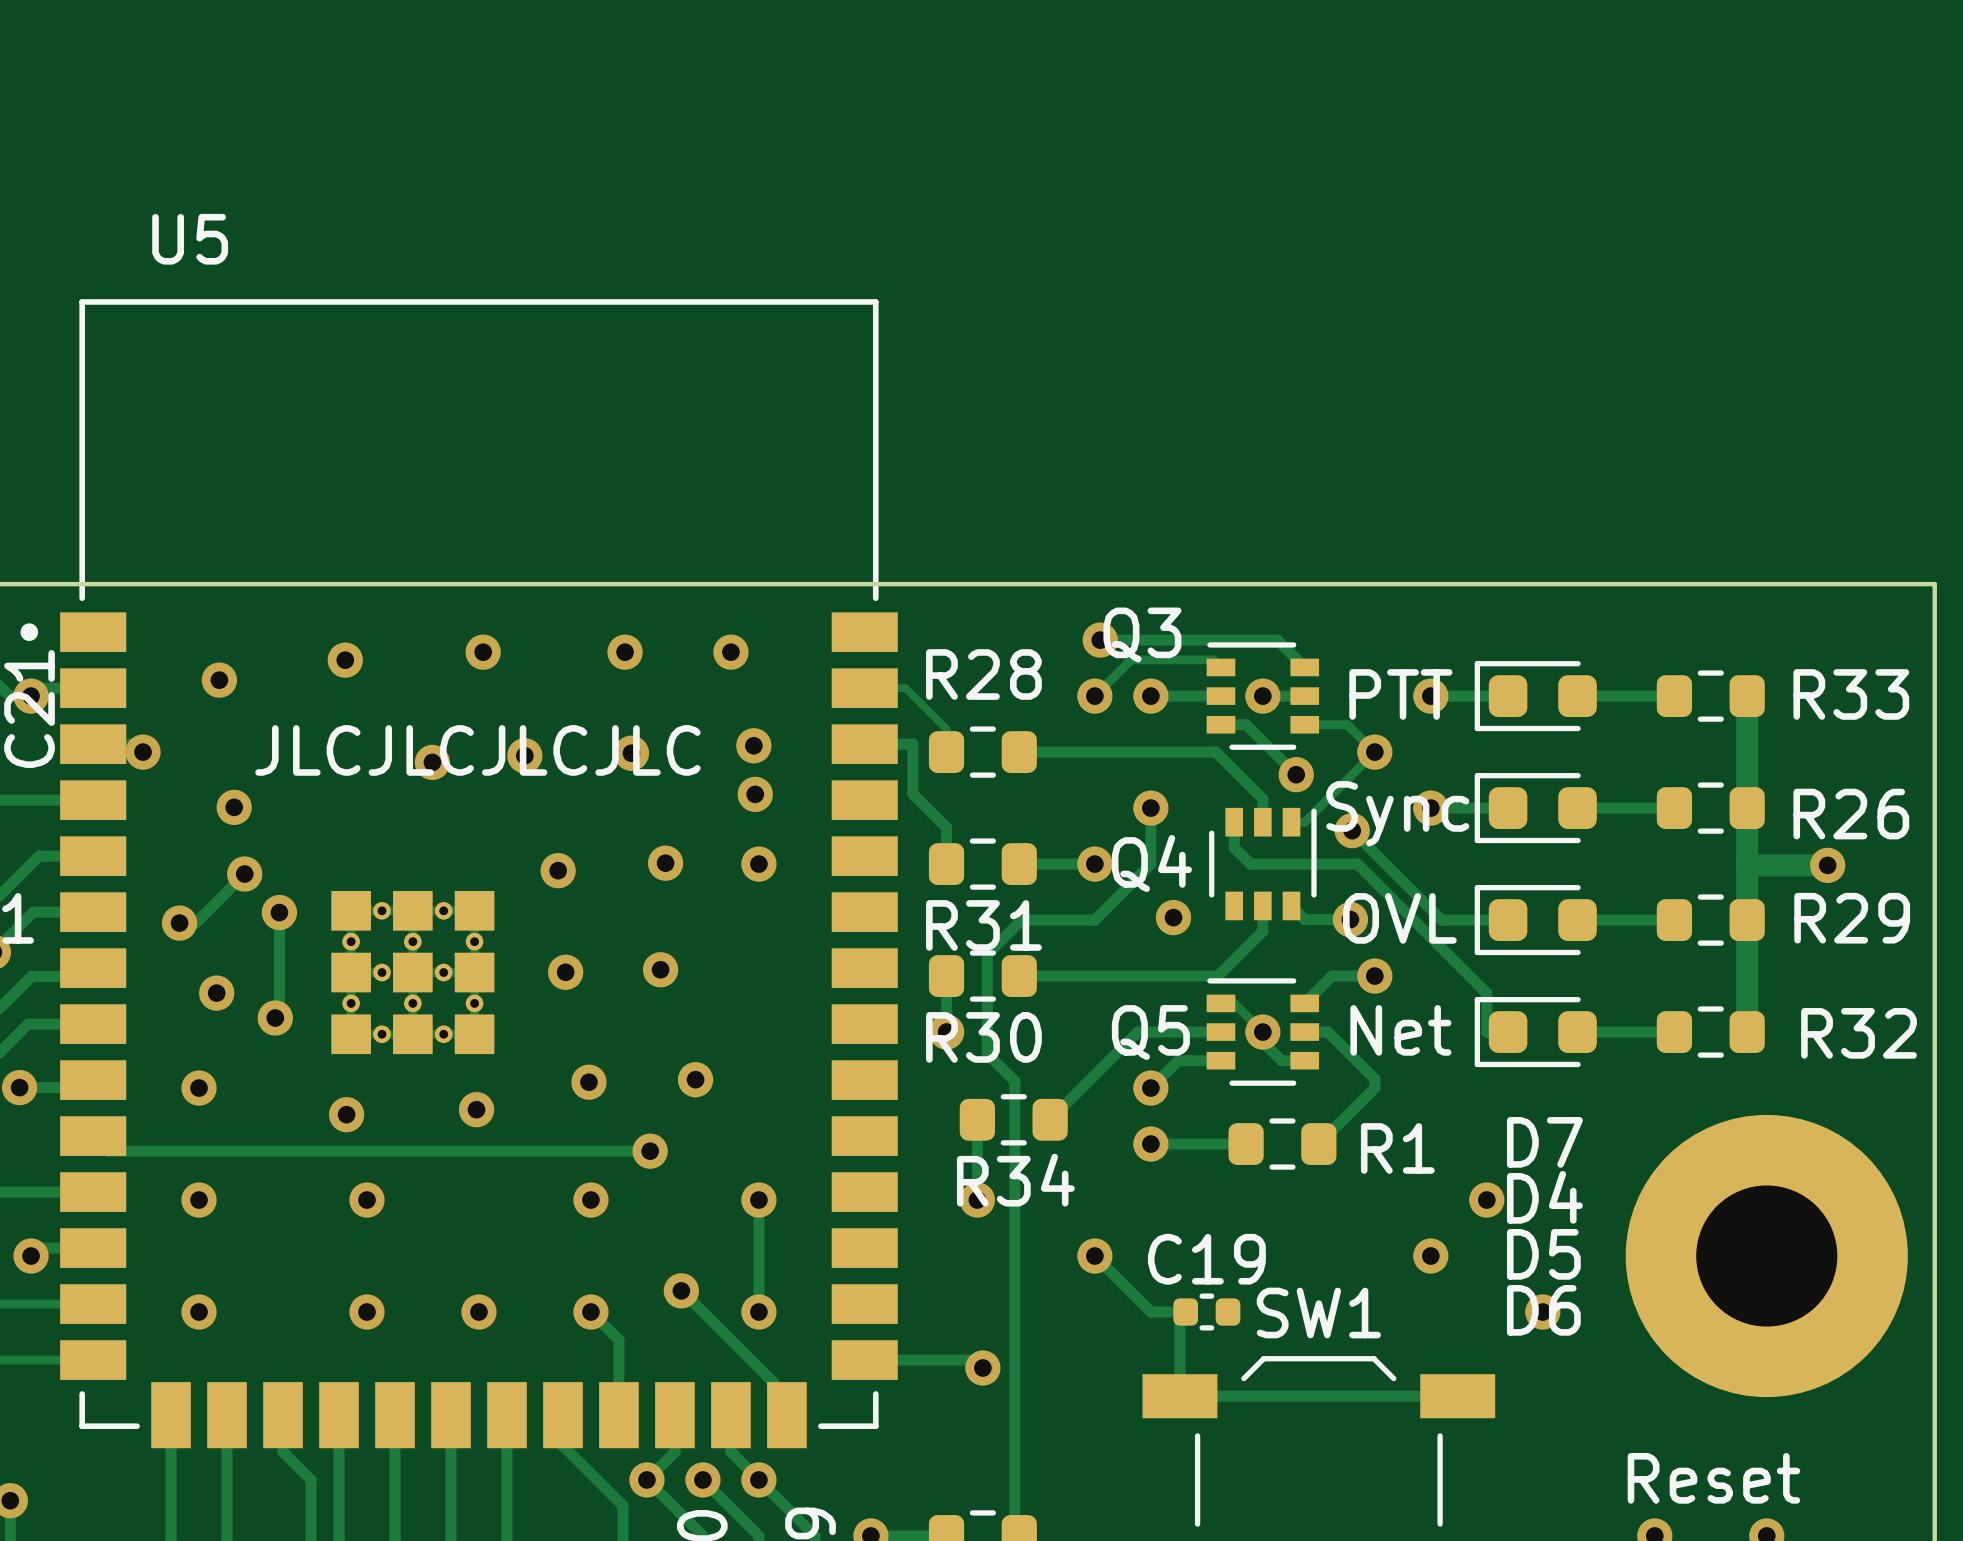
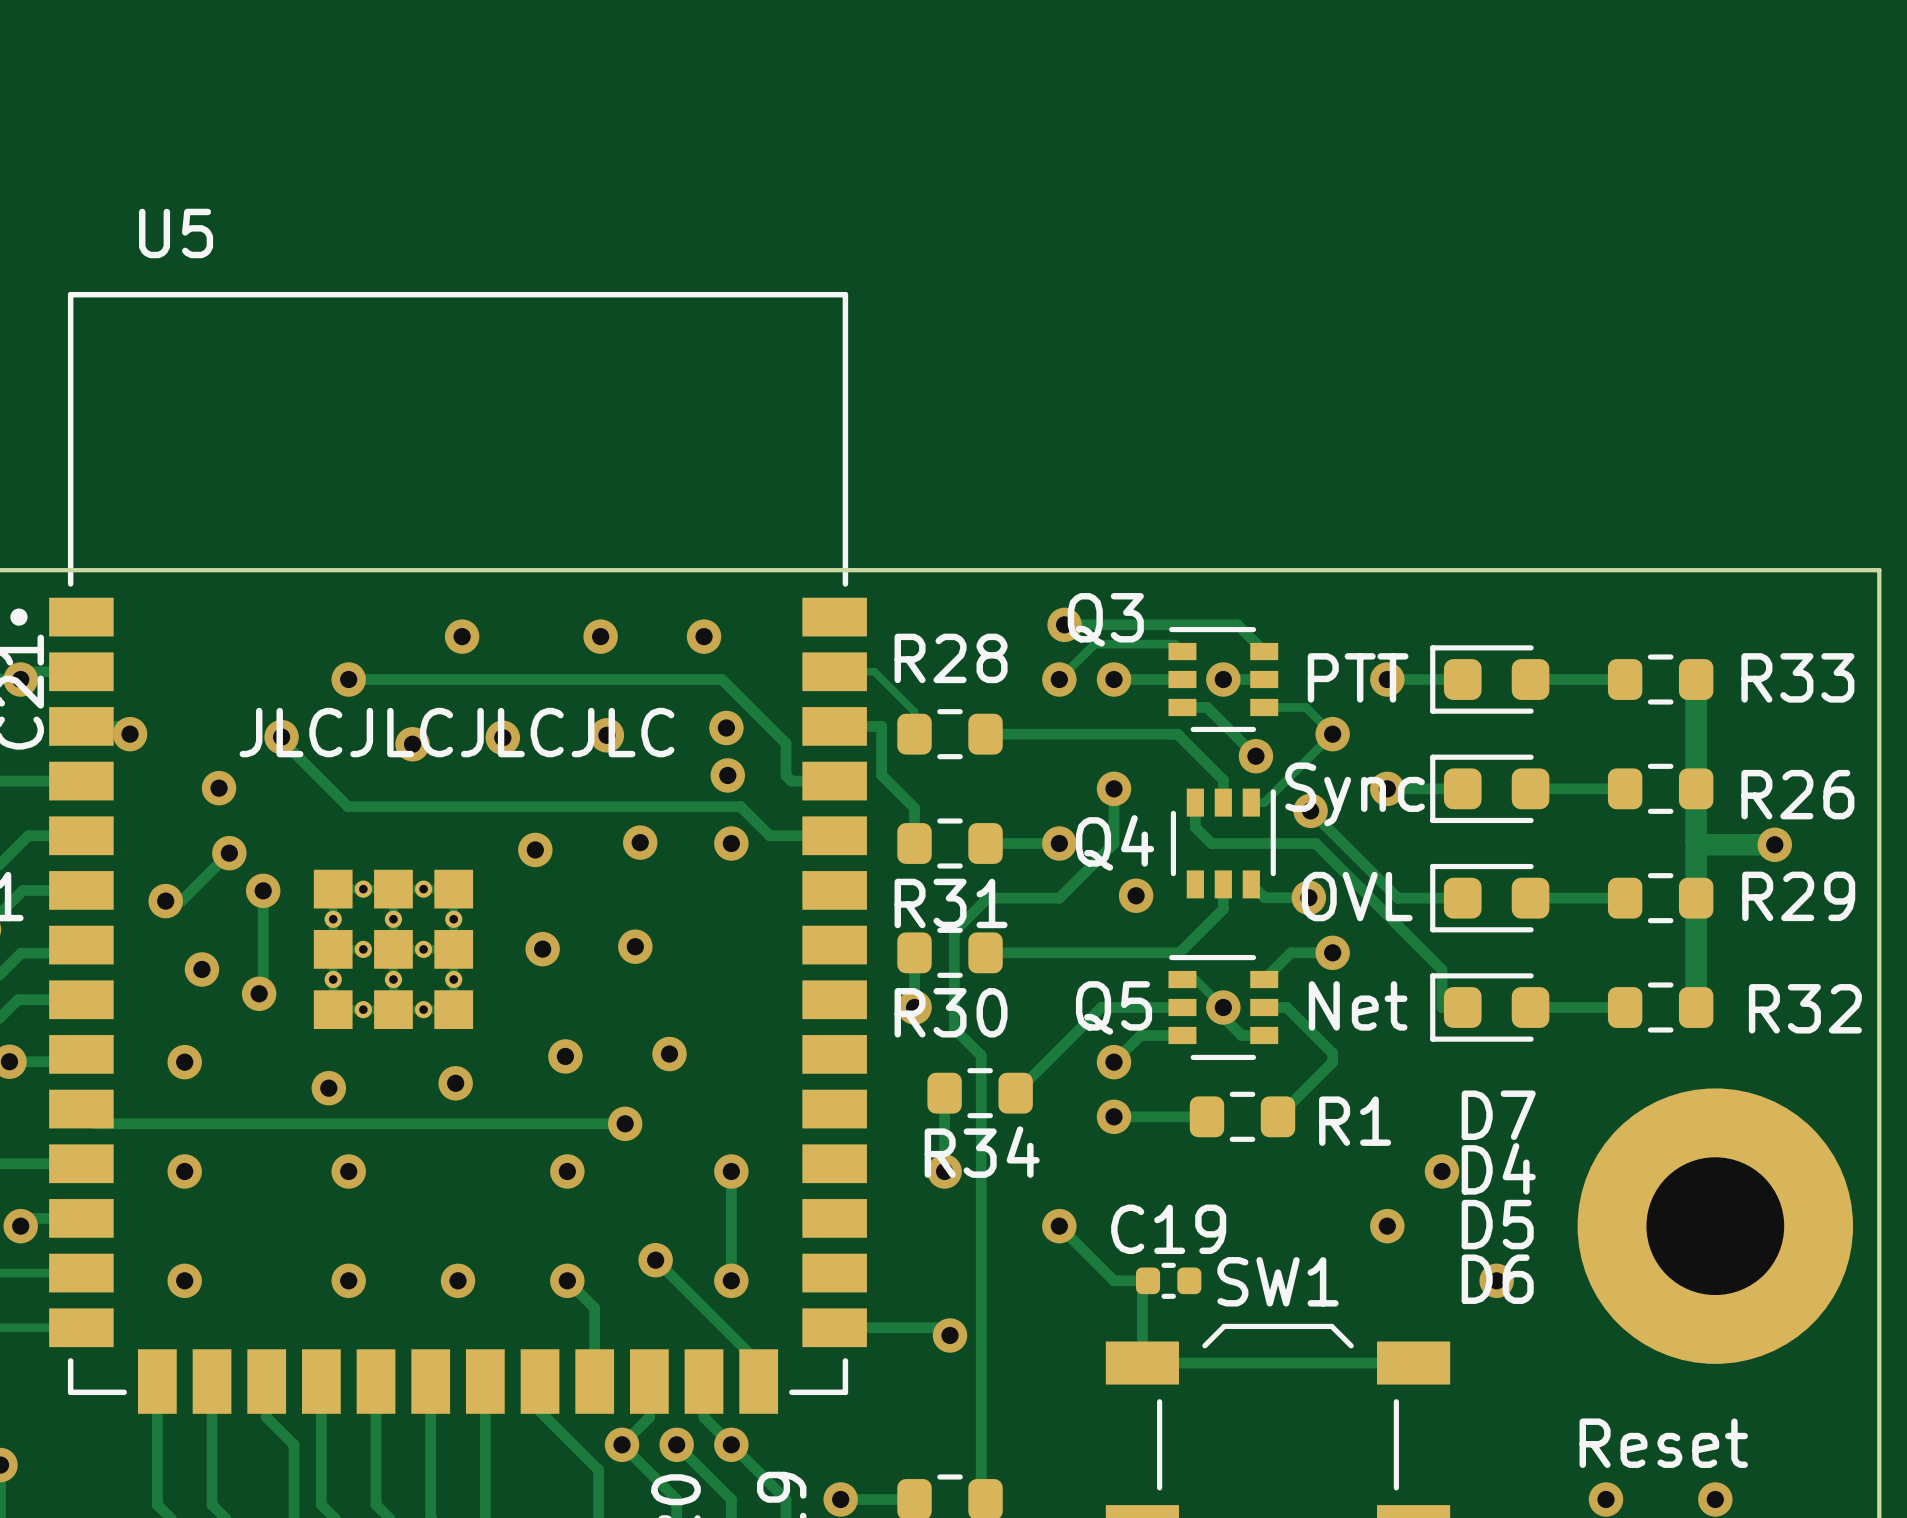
via position: (345, 660) -> (348, 679)
via: (219, 680) -> none
track: none -> (348, 679) (722, 679) (786, 743) (786, 775) (791, 781) (834, 781)
track: none -> (277, 736) (348, 806) (740, 806) (769, 835) (834, 835)
via: none -> (281, 737)

